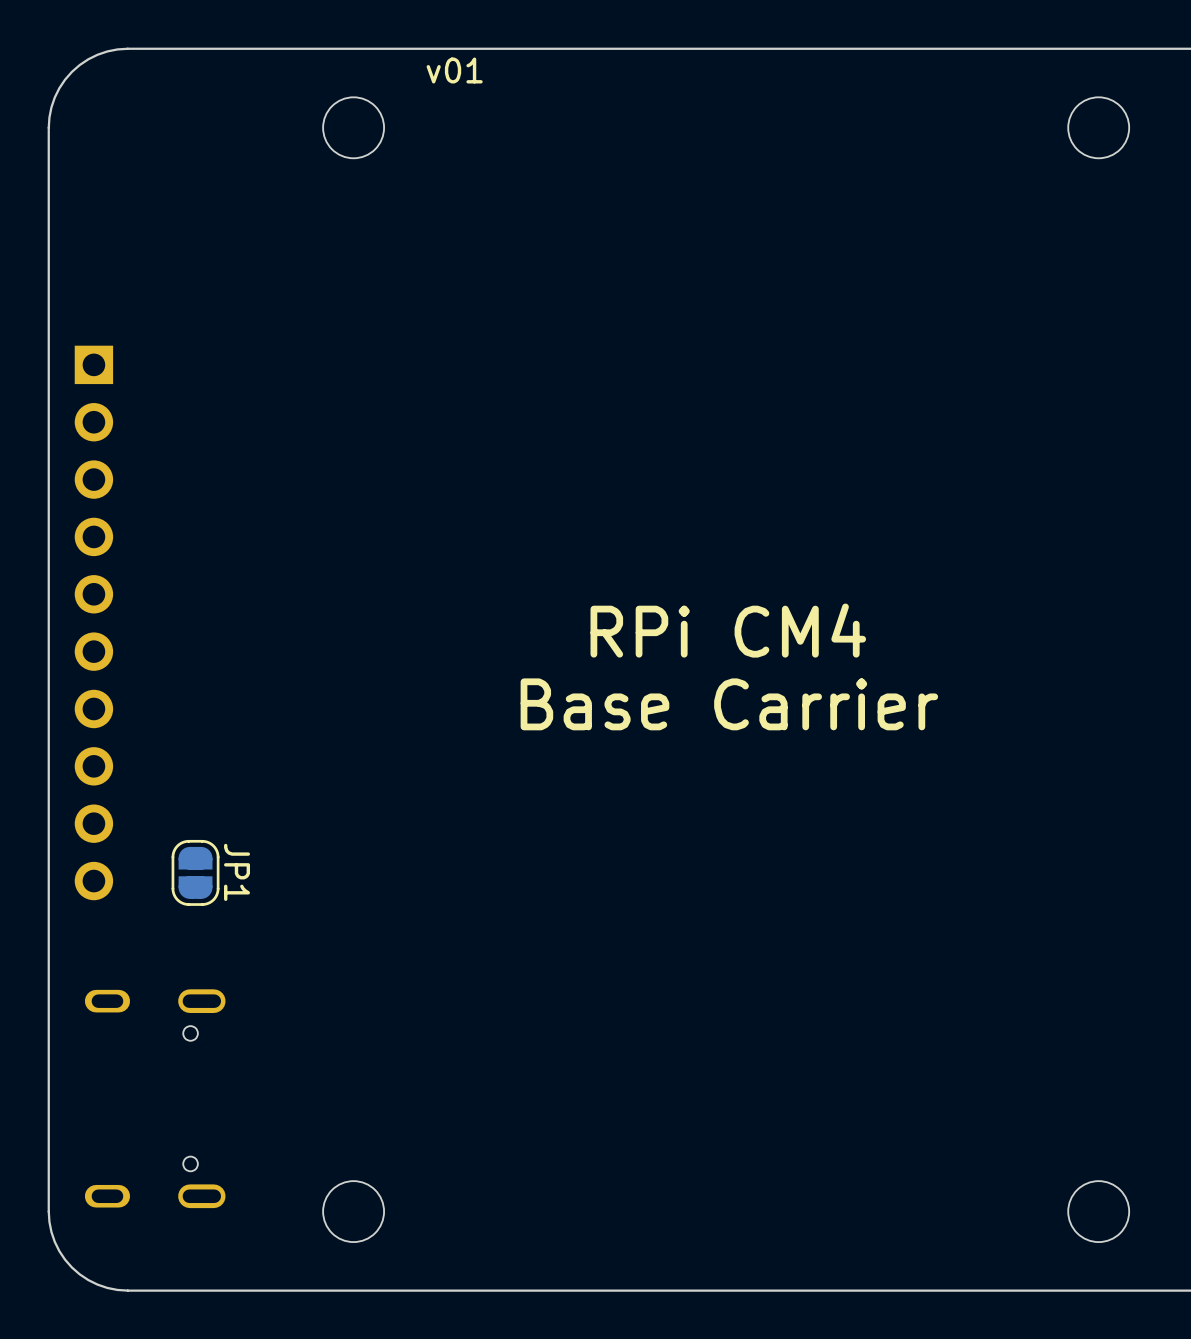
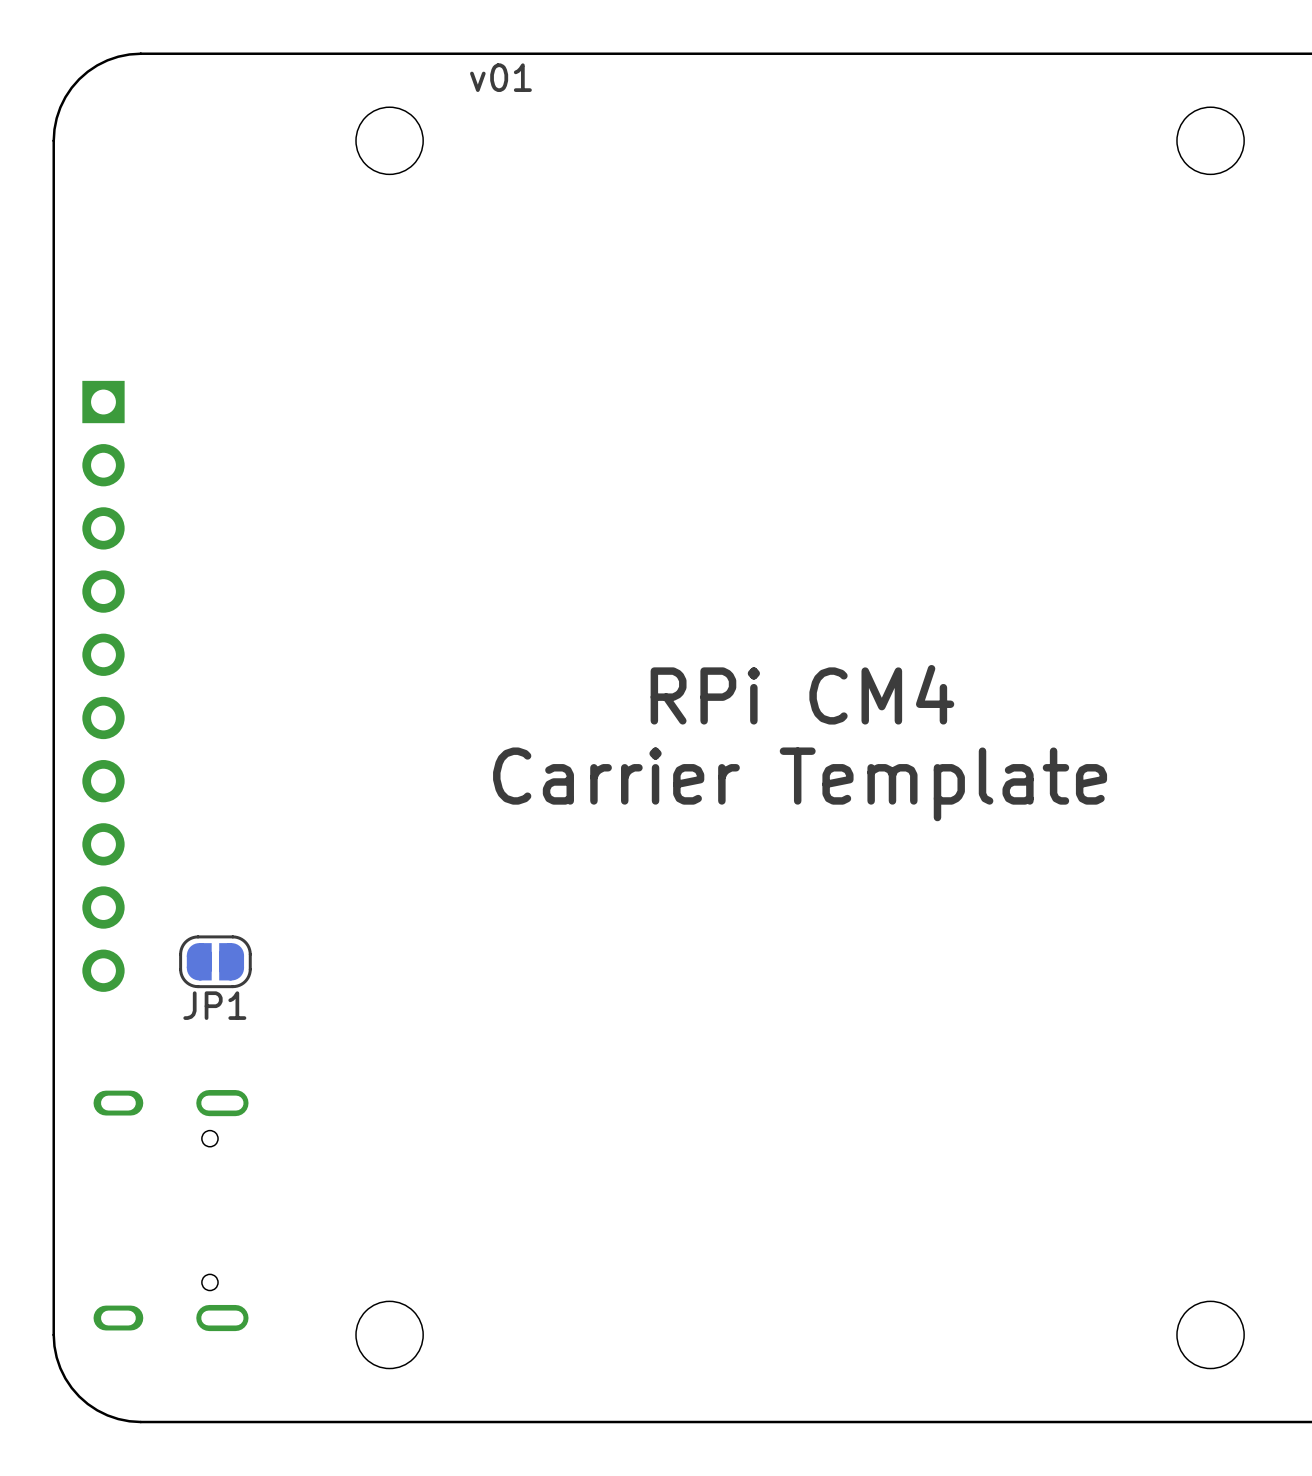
text: Base Carrier (729, 704) -> Carrier Template (800, 784)
JP1 rotation: 0° (195, 872) -> 90° clockwise (215, 961)

